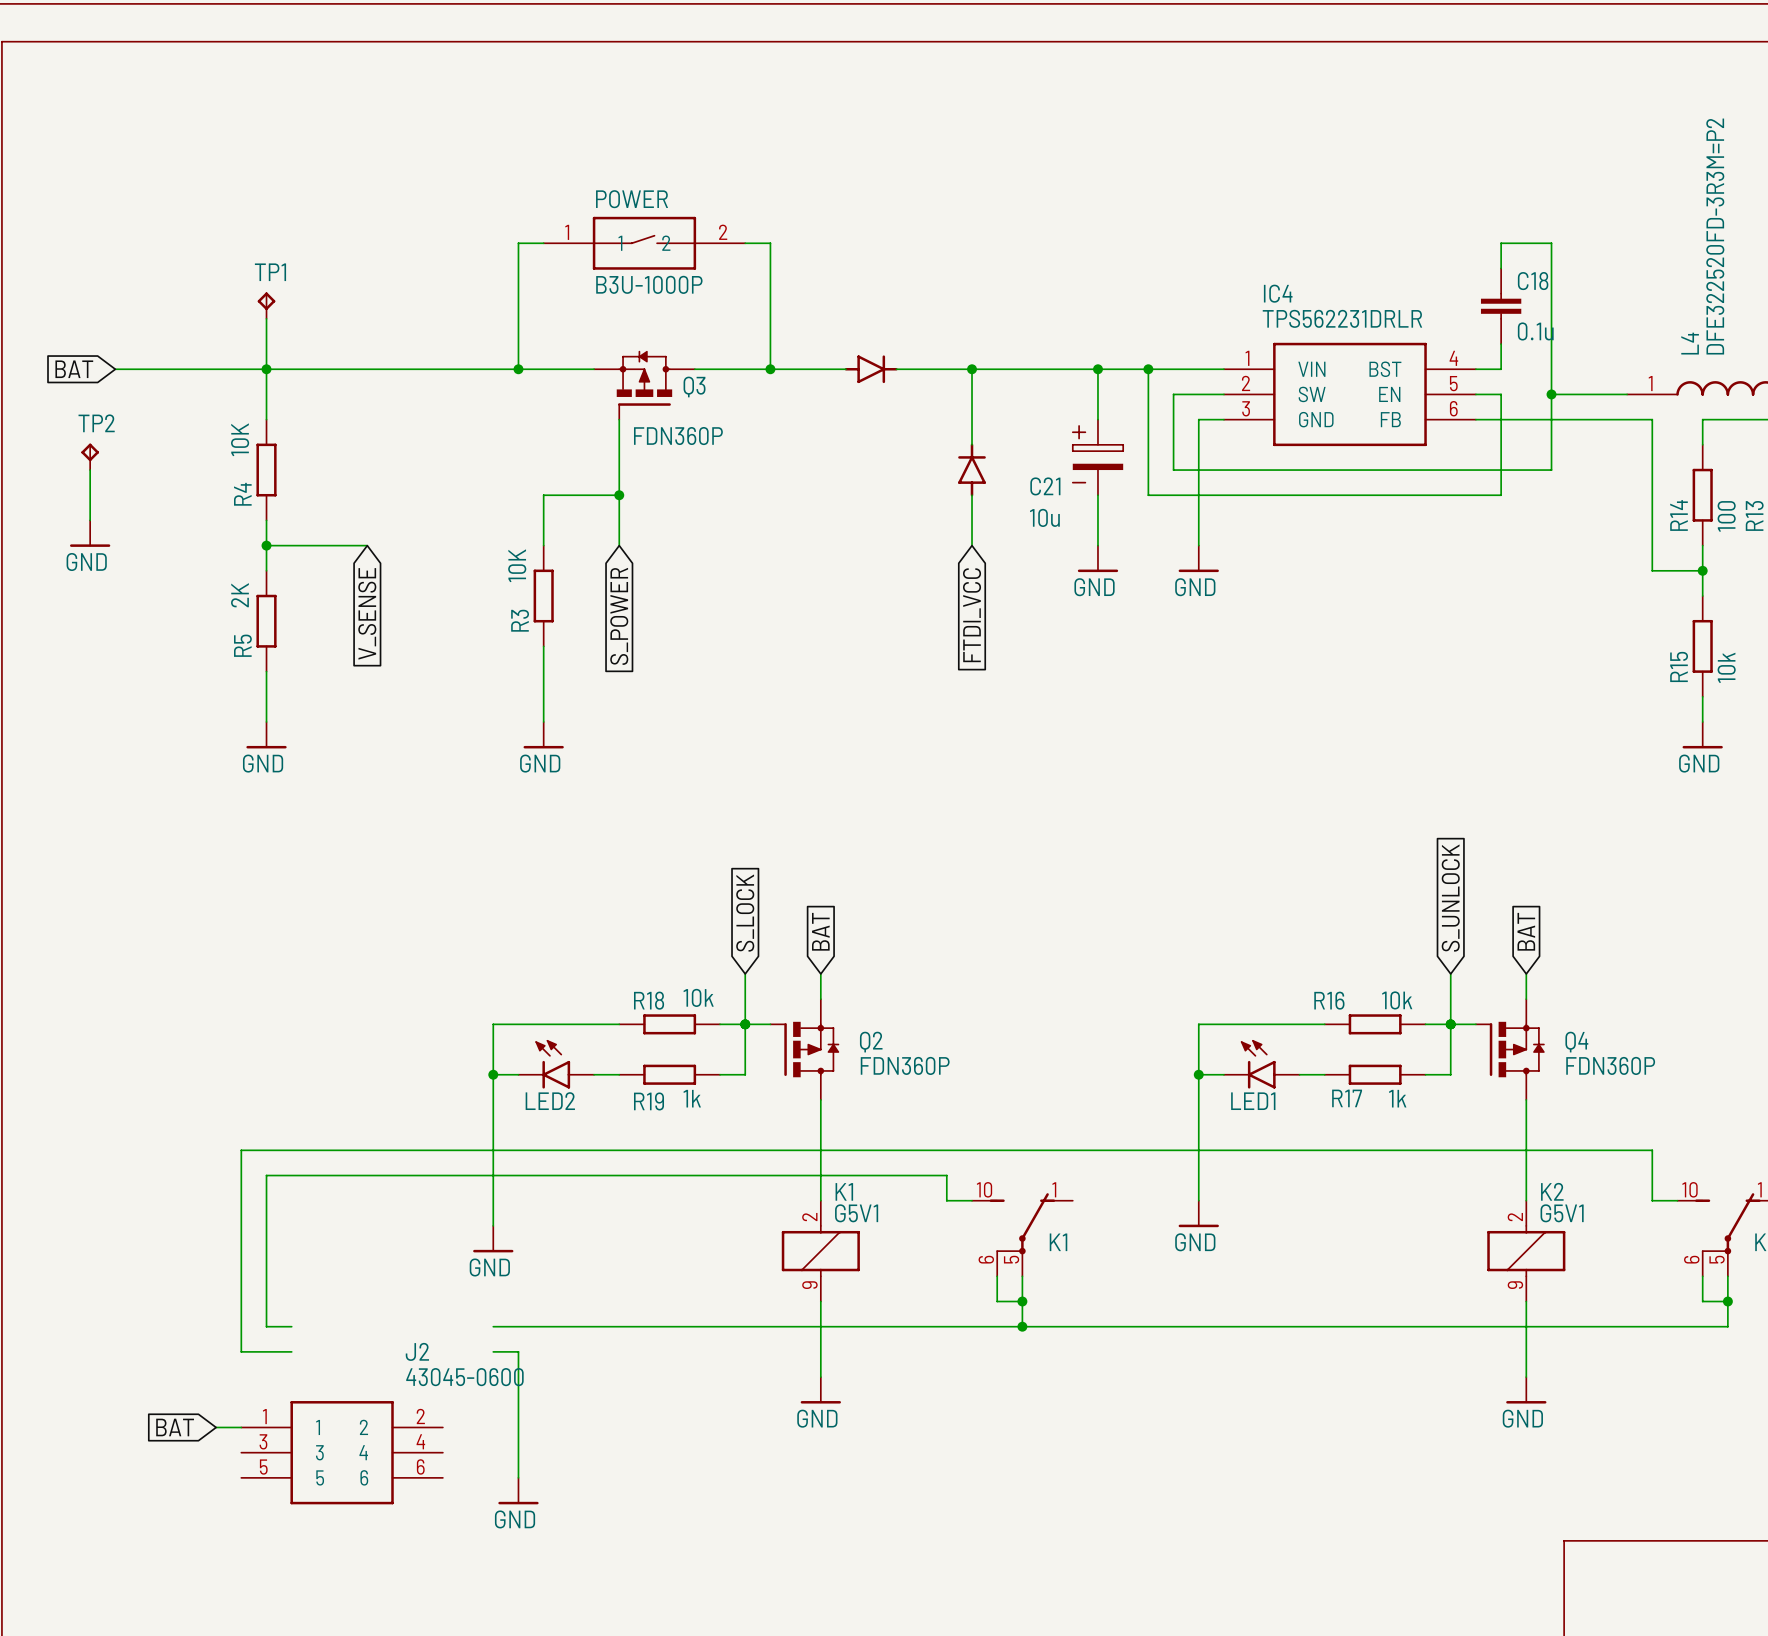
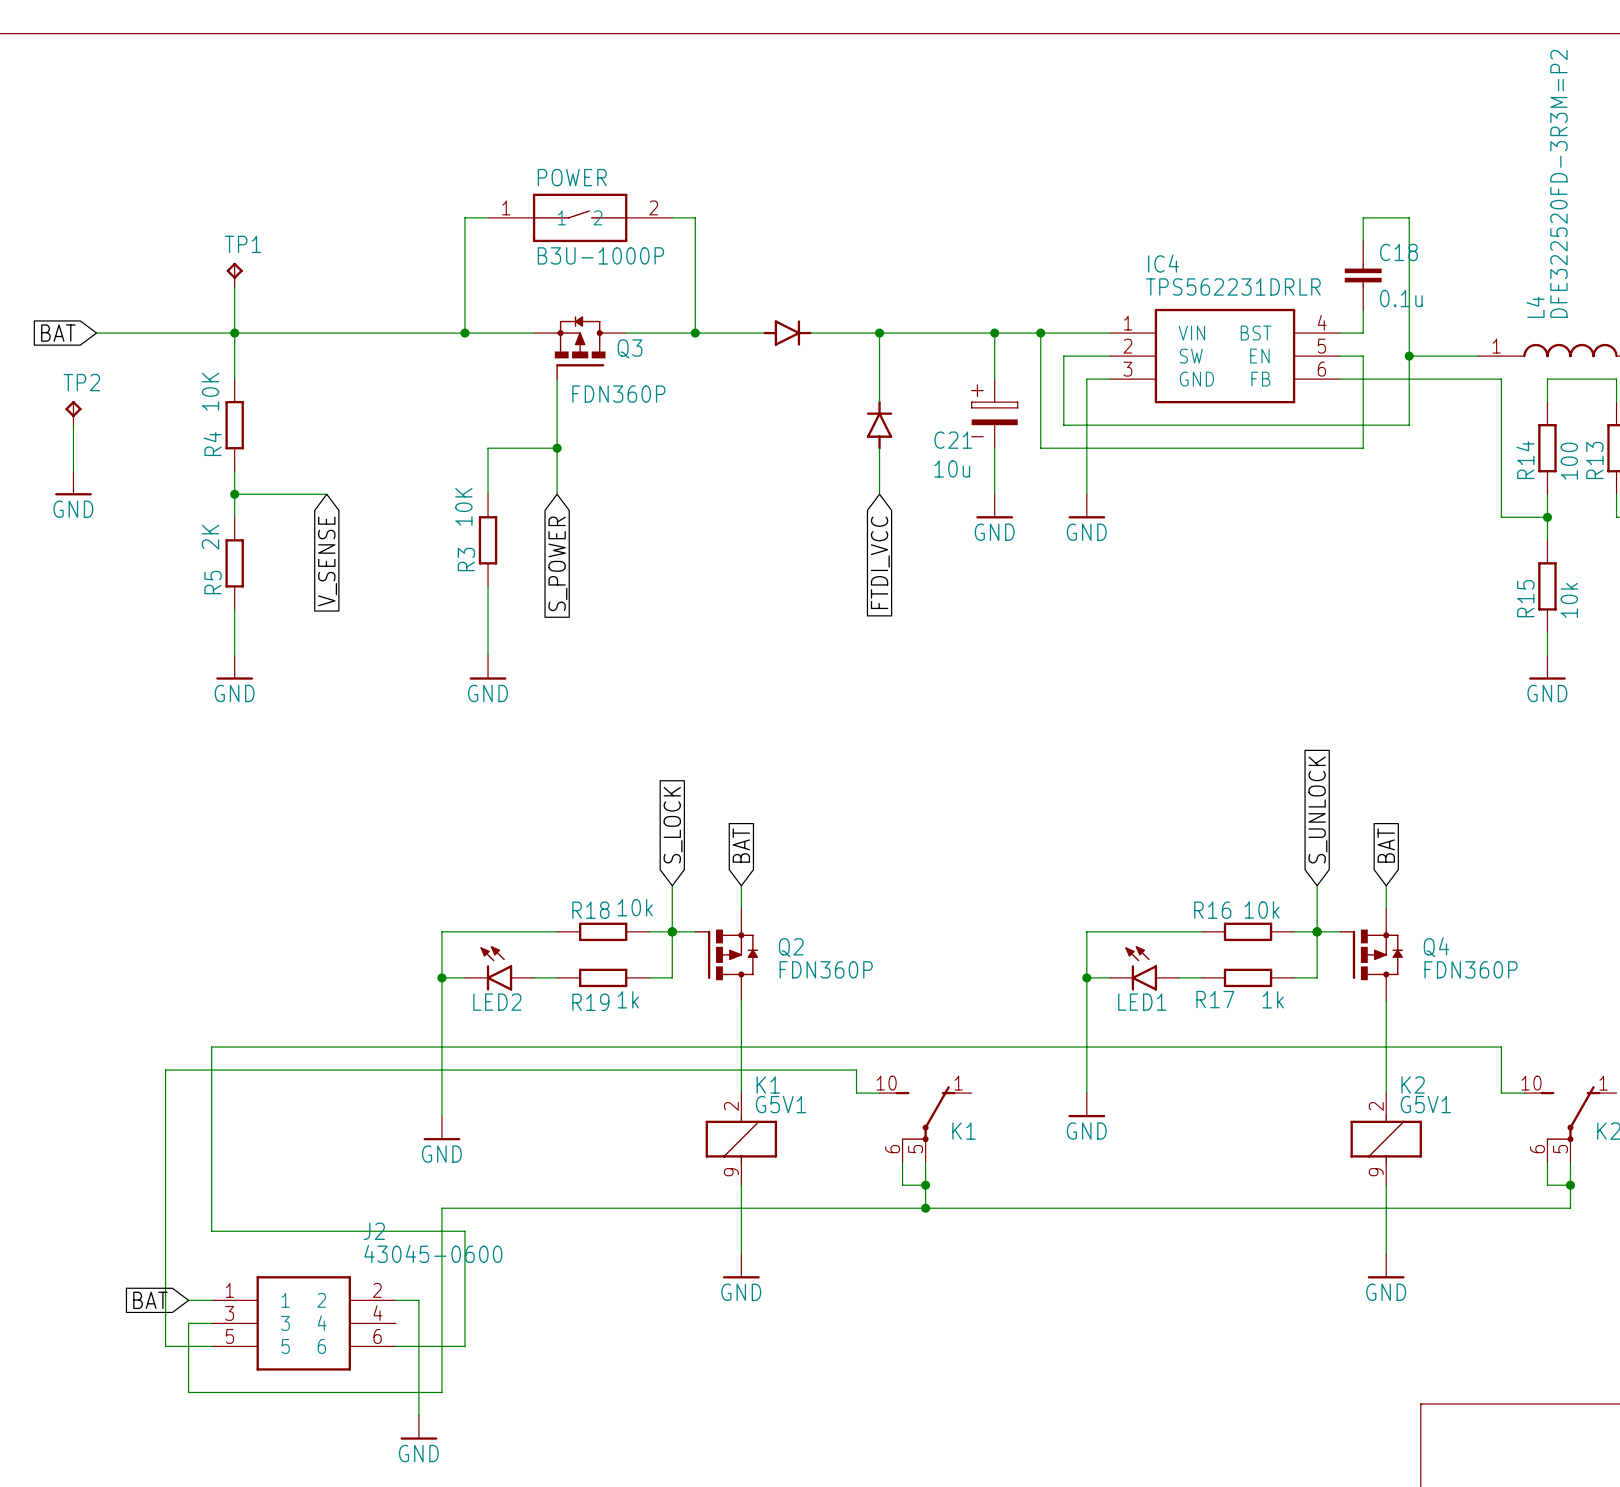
wire: (266, 1175) (266, 1326) (291, 1326) -> (234, 1070) (165, 1070) (165, 1346) (211, 1346)
wire: none -> (441, 1208) (441, 1392) (188, 1392) (188, 1323) (211, 1323)
wire: none -> (257, 1231) (441, 1231)
wire: none -> (395, 1300) (418, 1300) (418, 1415)
wire: none -> (395, 1346) (464, 1346)
power symbol position: GND (518, 1491) -> GND (418, 1427)

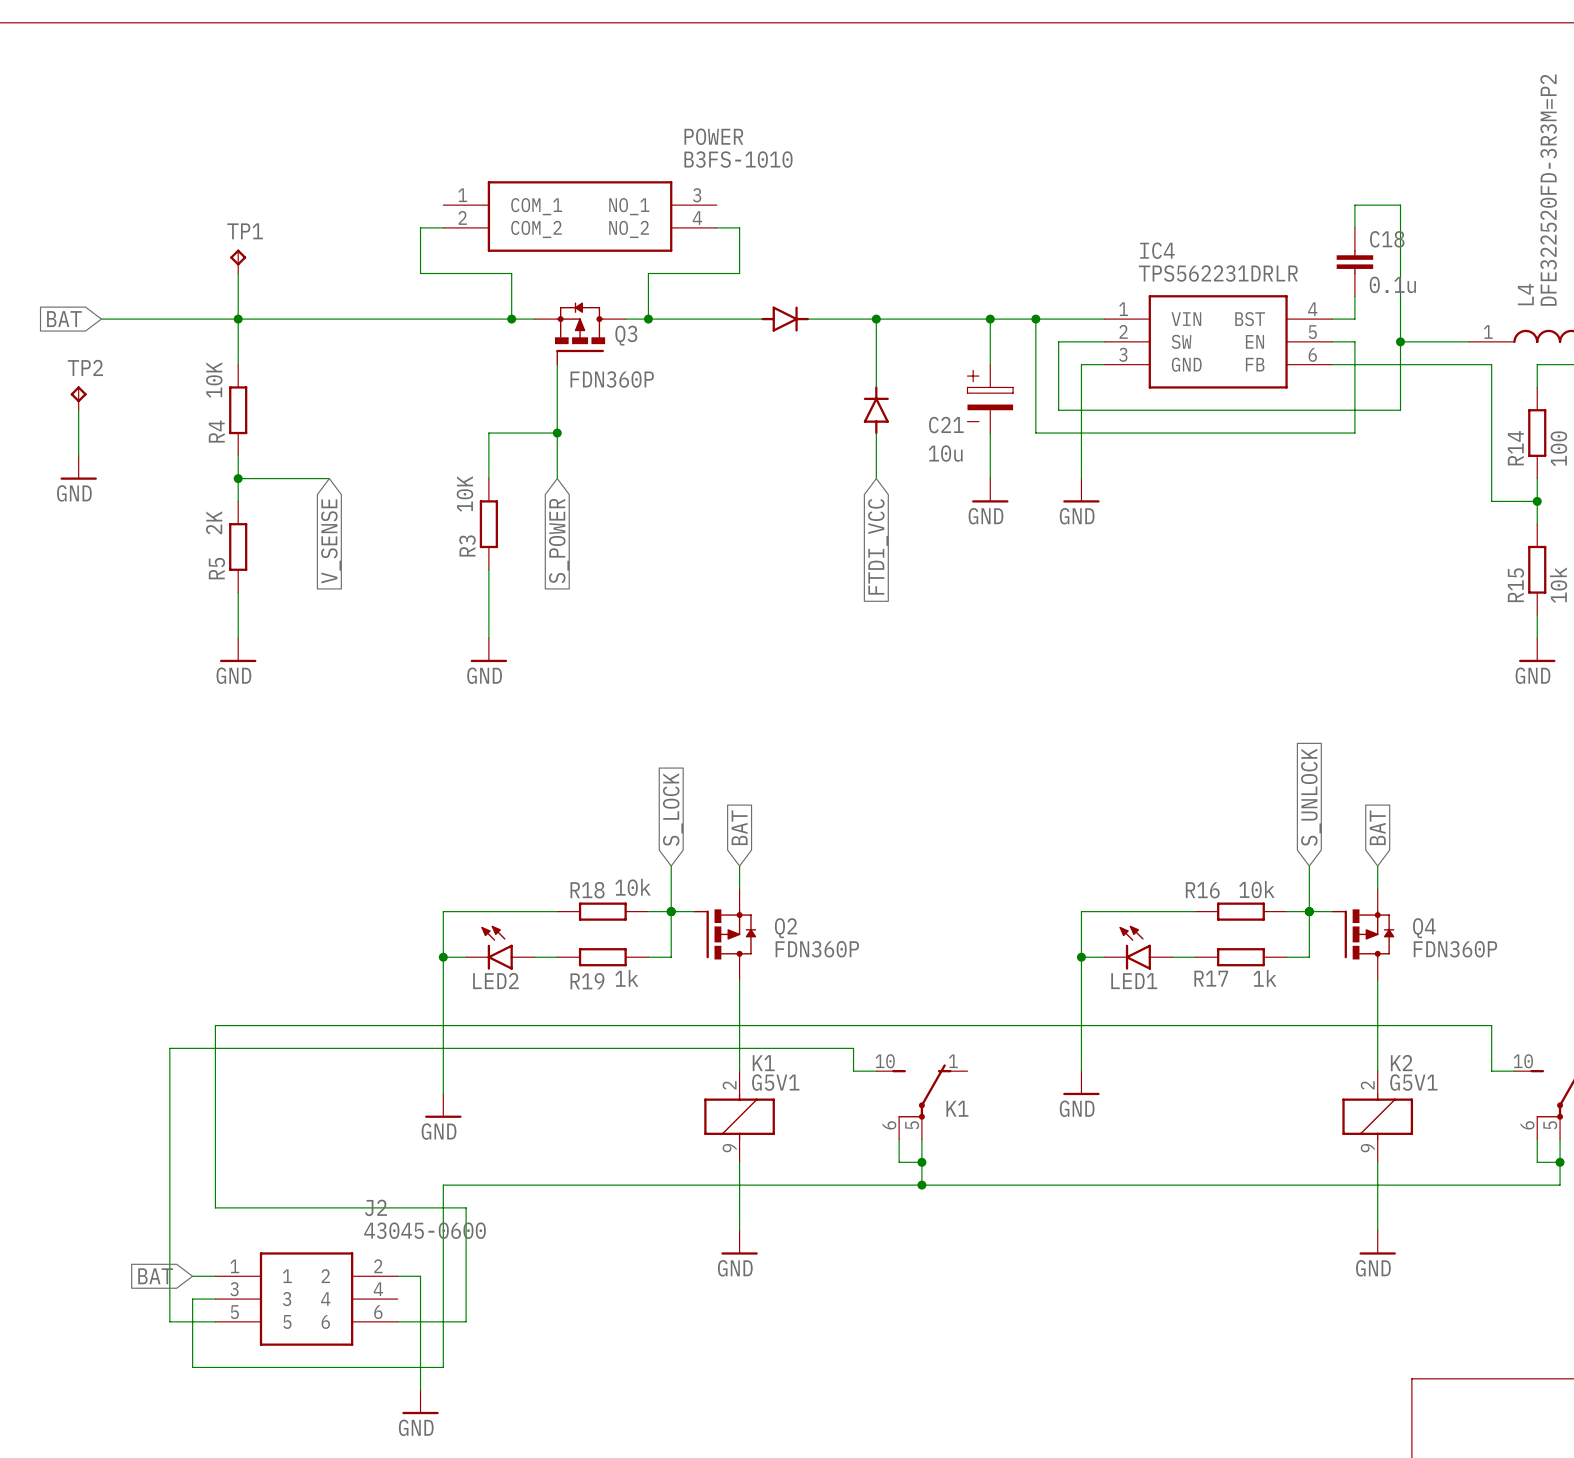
wire: (488, 217) (464, 217) (464, 333) -> none
POWER: B3U-1000P (580, 217) -> none
wire: (672, 217) (695, 217) (695, 333) -> none
POWER: none -> B3FS-1010 (580, 216)
wire: none -> (443, 227) (420, 227) (420, 273) (511, 273) (511, 319)
wire: none -> (716, 227) (739, 227) (739, 273) (648, 273) (648, 319)
junction position: (464, 333) -> (511, 319)
junction position: (695, 333) -> (648, 319)

